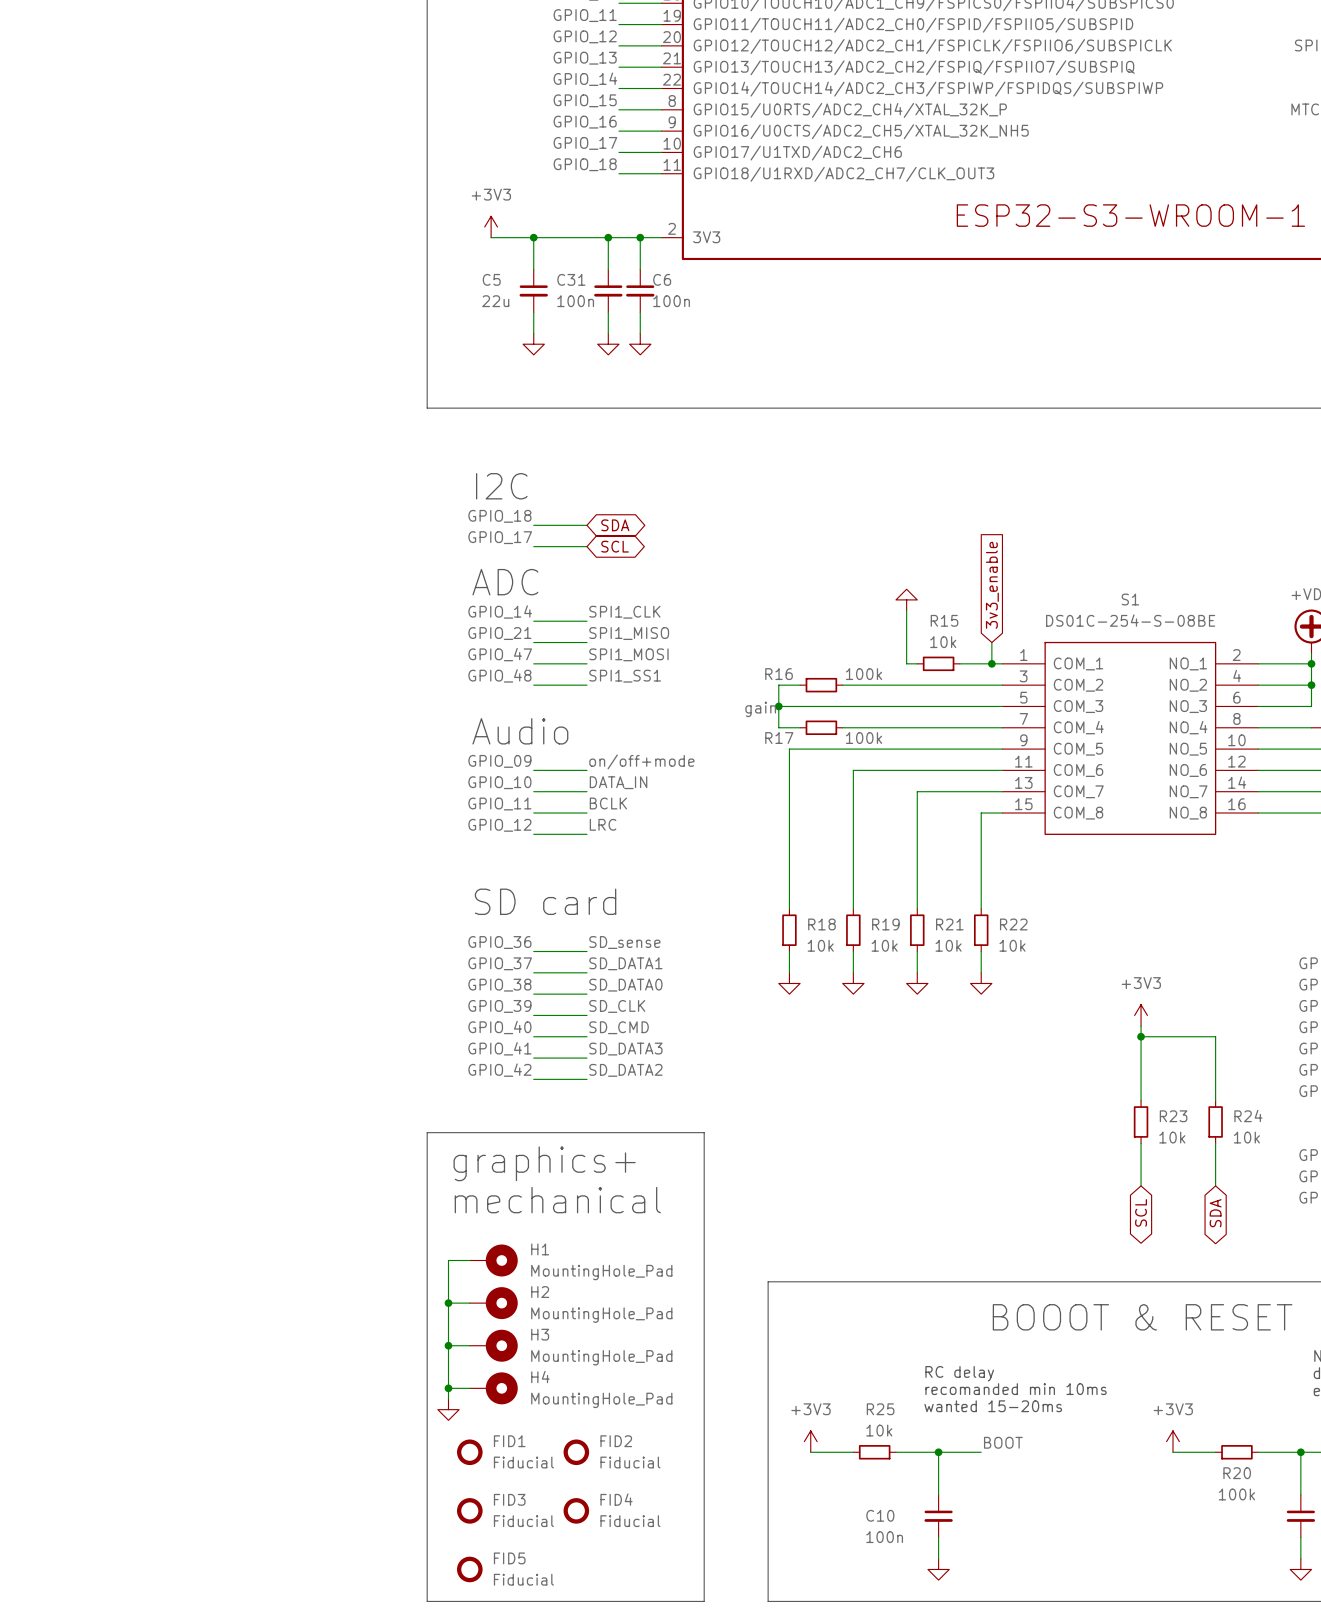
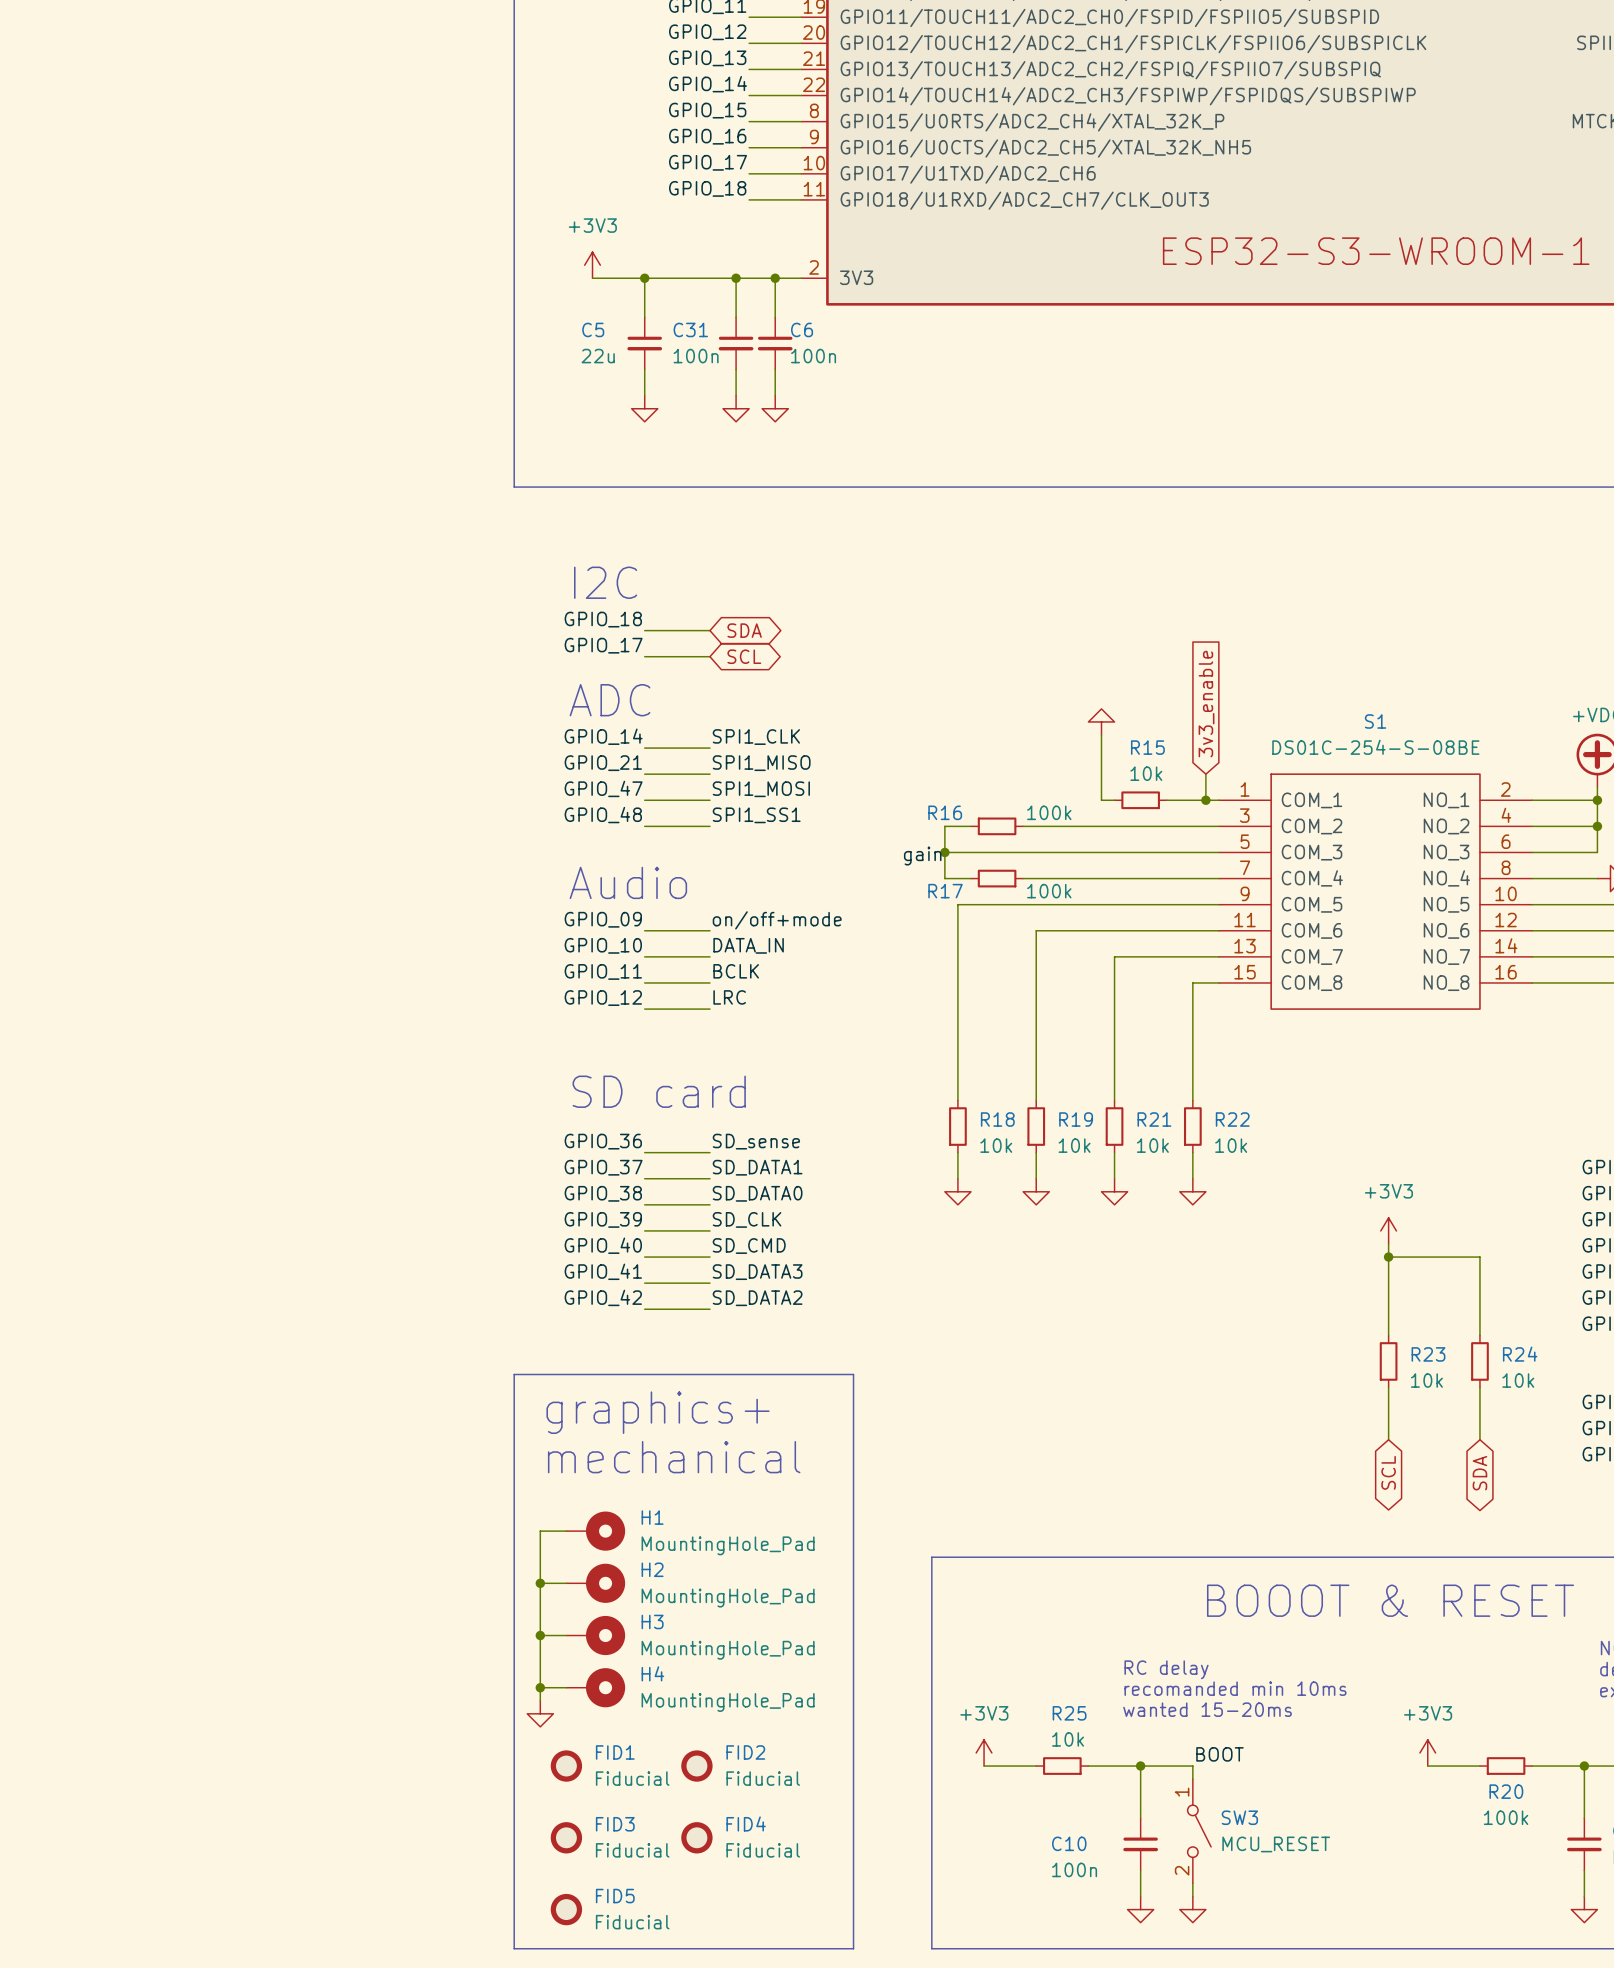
wire: none -> (1192, 1766) (1192, 1779)
SW3: none -> MCU_RESET (1199, 1831)
wire: none -> (1192, 1883) (1192, 1896)
power symbol: none -> (1192, 1909)

